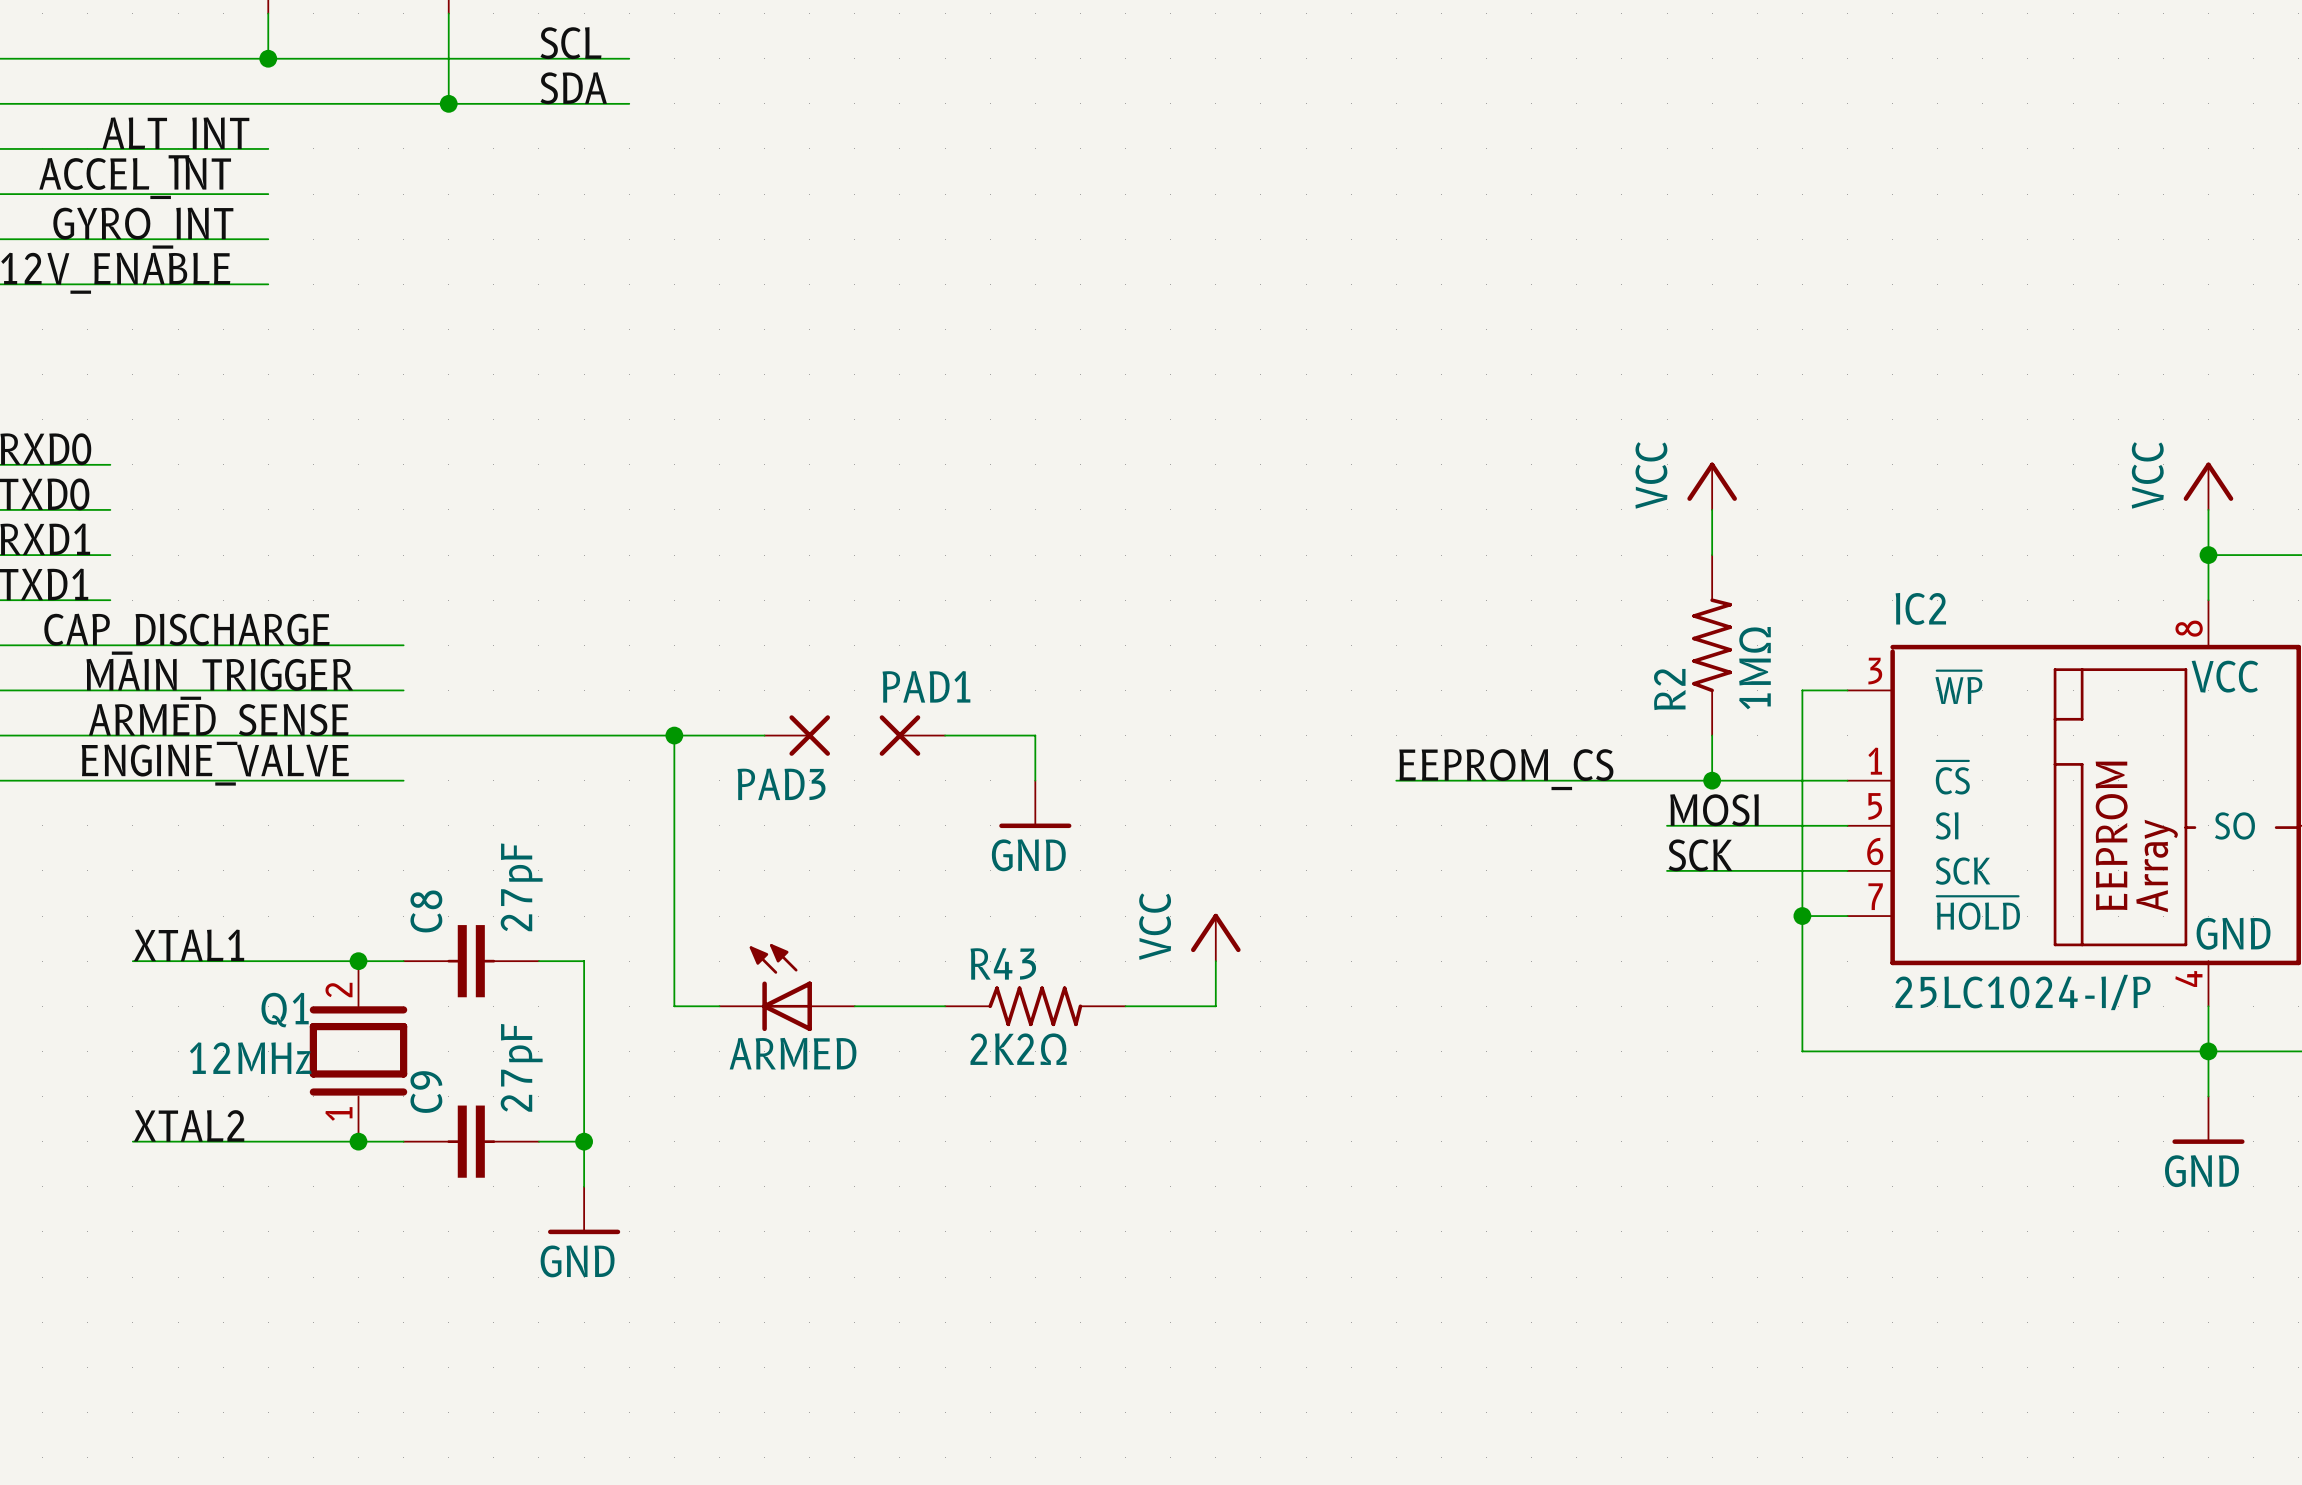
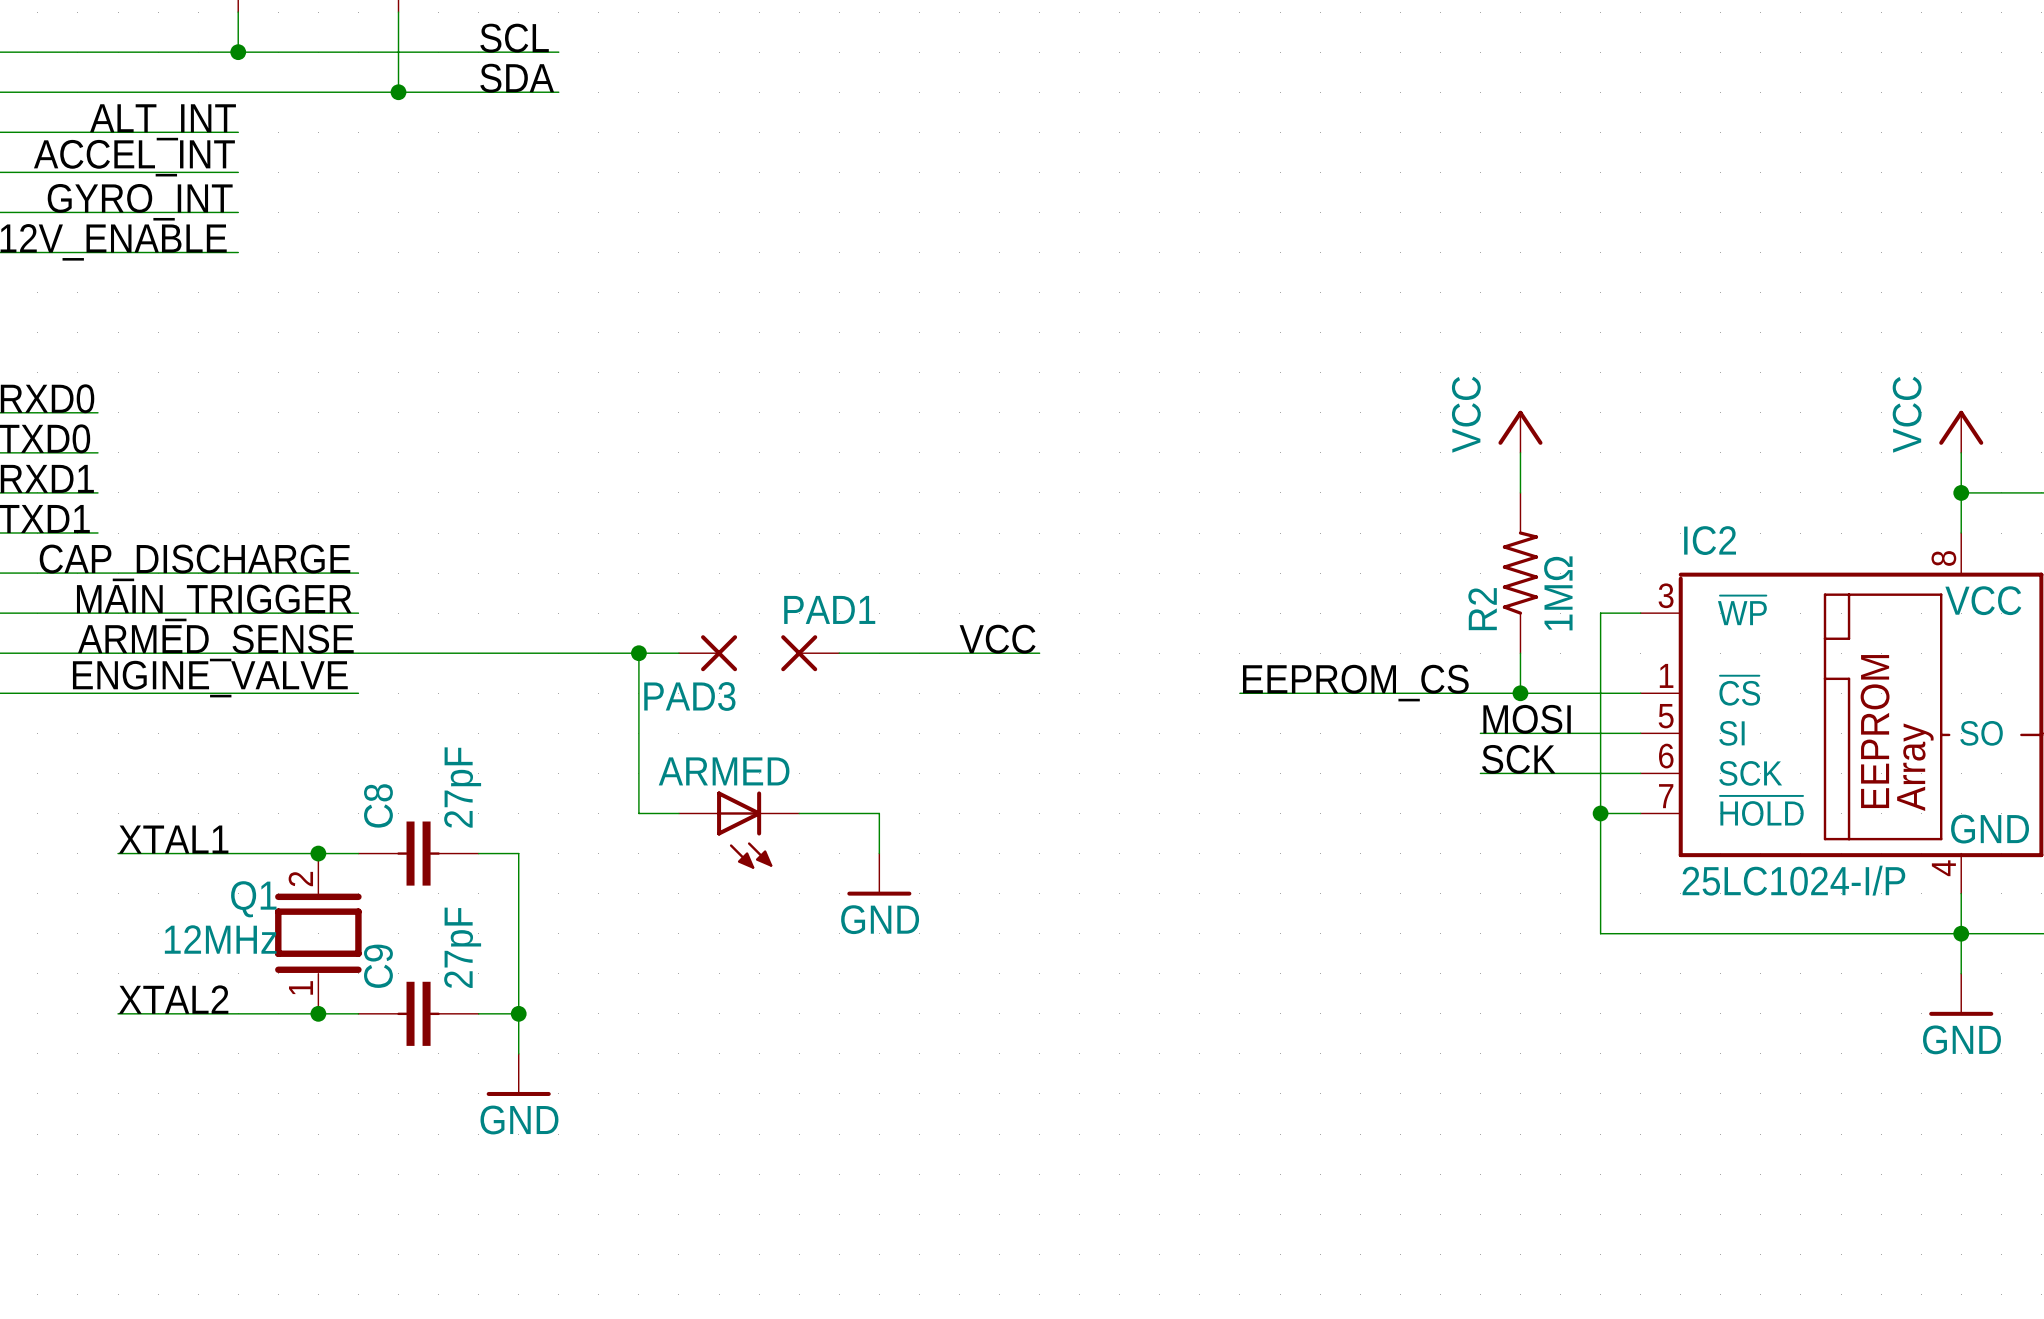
label: none -> VCC (997, 639)
wire: (674, 735) (674, 1006) (719, 1006) -> none
junction position: (674, 735) -> (638, 653)
wire: none -> (638, 653) (638, 813) (678, 813)
wire: (1035, 735) (1035, 780) -> (919, 653) (1039, 653)
power symbol position: GND (1035, 804) -> GND (879, 874)
wire: none -> (799, 813) (879, 813) (879, 853)
power symbol: VCC (1215, 937) -> none
wire: (1215, 961) (1215, 1006) (1125, 1006) -> none
ARMED rotation: 0° (780, 987) -> 180° (744, 830)
wire: (854, 1006) (945, 1006) -> none
R43: 2K2Ω (1035, 1006) -> none

